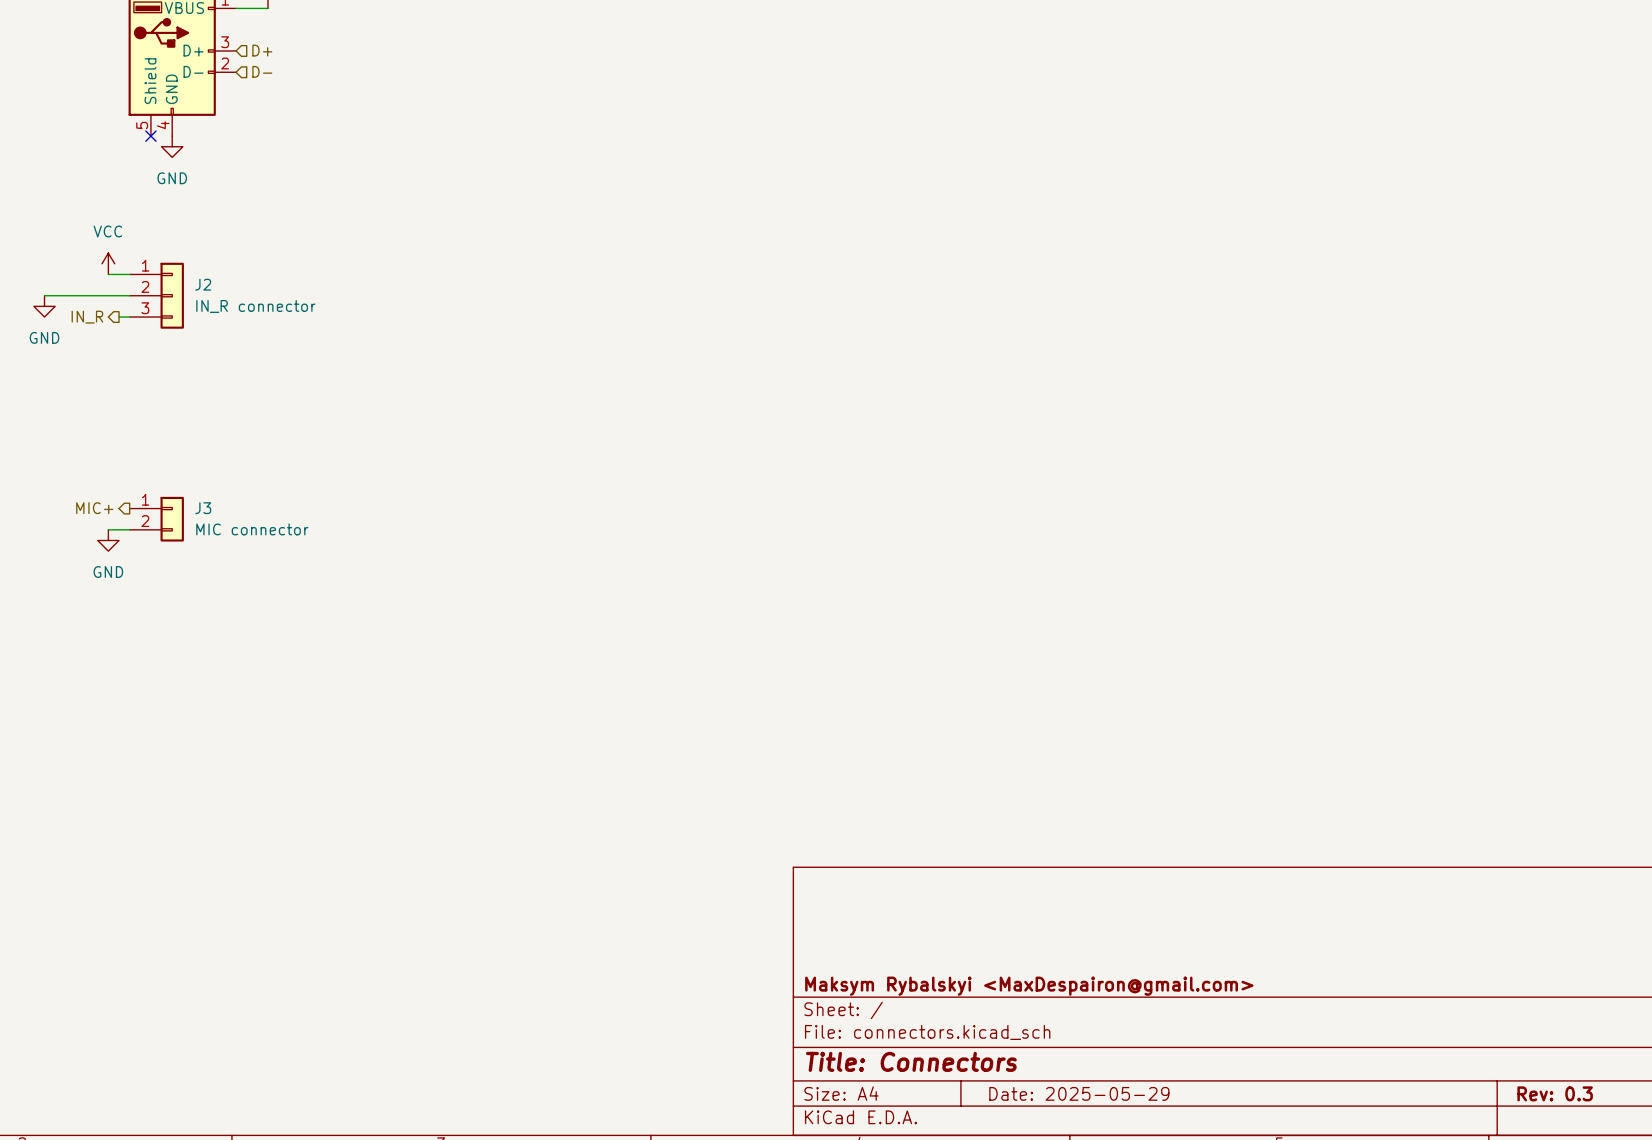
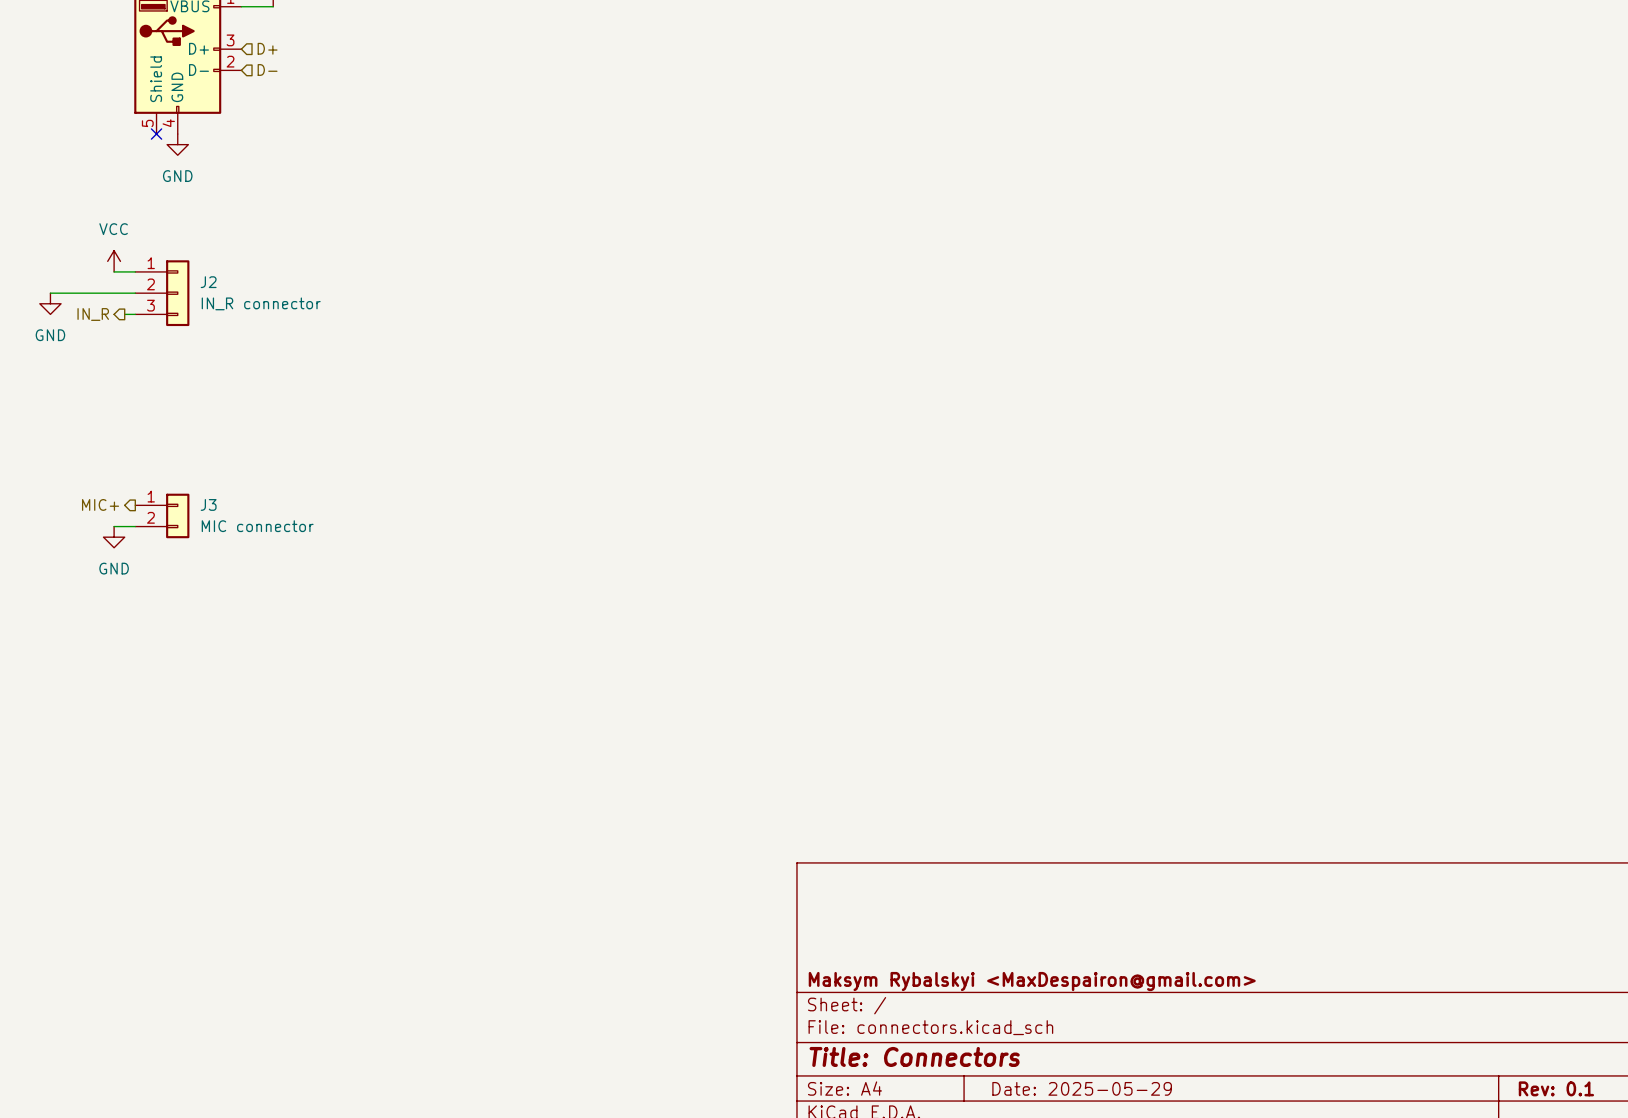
title block: Rev: 0.3 (1555, 1093) -> Rev: 0.1 (1556, 1088)

